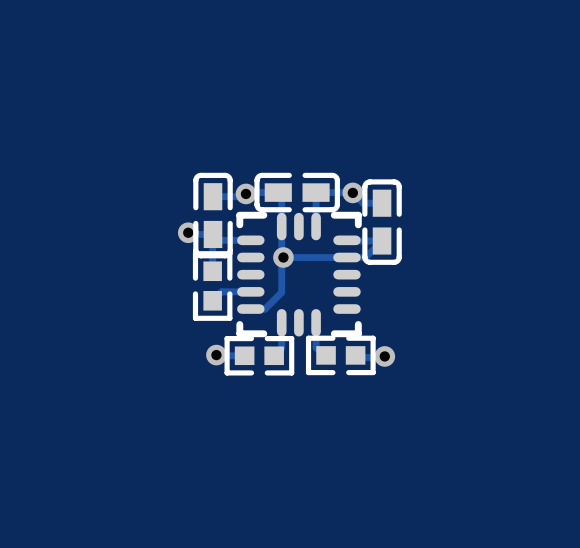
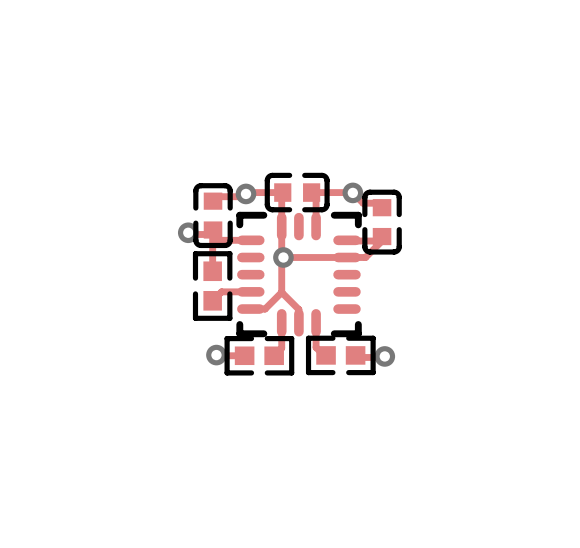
part footprint: [193, 172, 233, 259] -> [193, 183, 233, 249]
part footprint: [254, 172, 340, 213] -> [264, 172, 330, 213]
part footprint: [362, 179, 402, 265] -> [362, 189, 402, 255]
track: none -> (281, 292) (298, 309) (298, 322)

